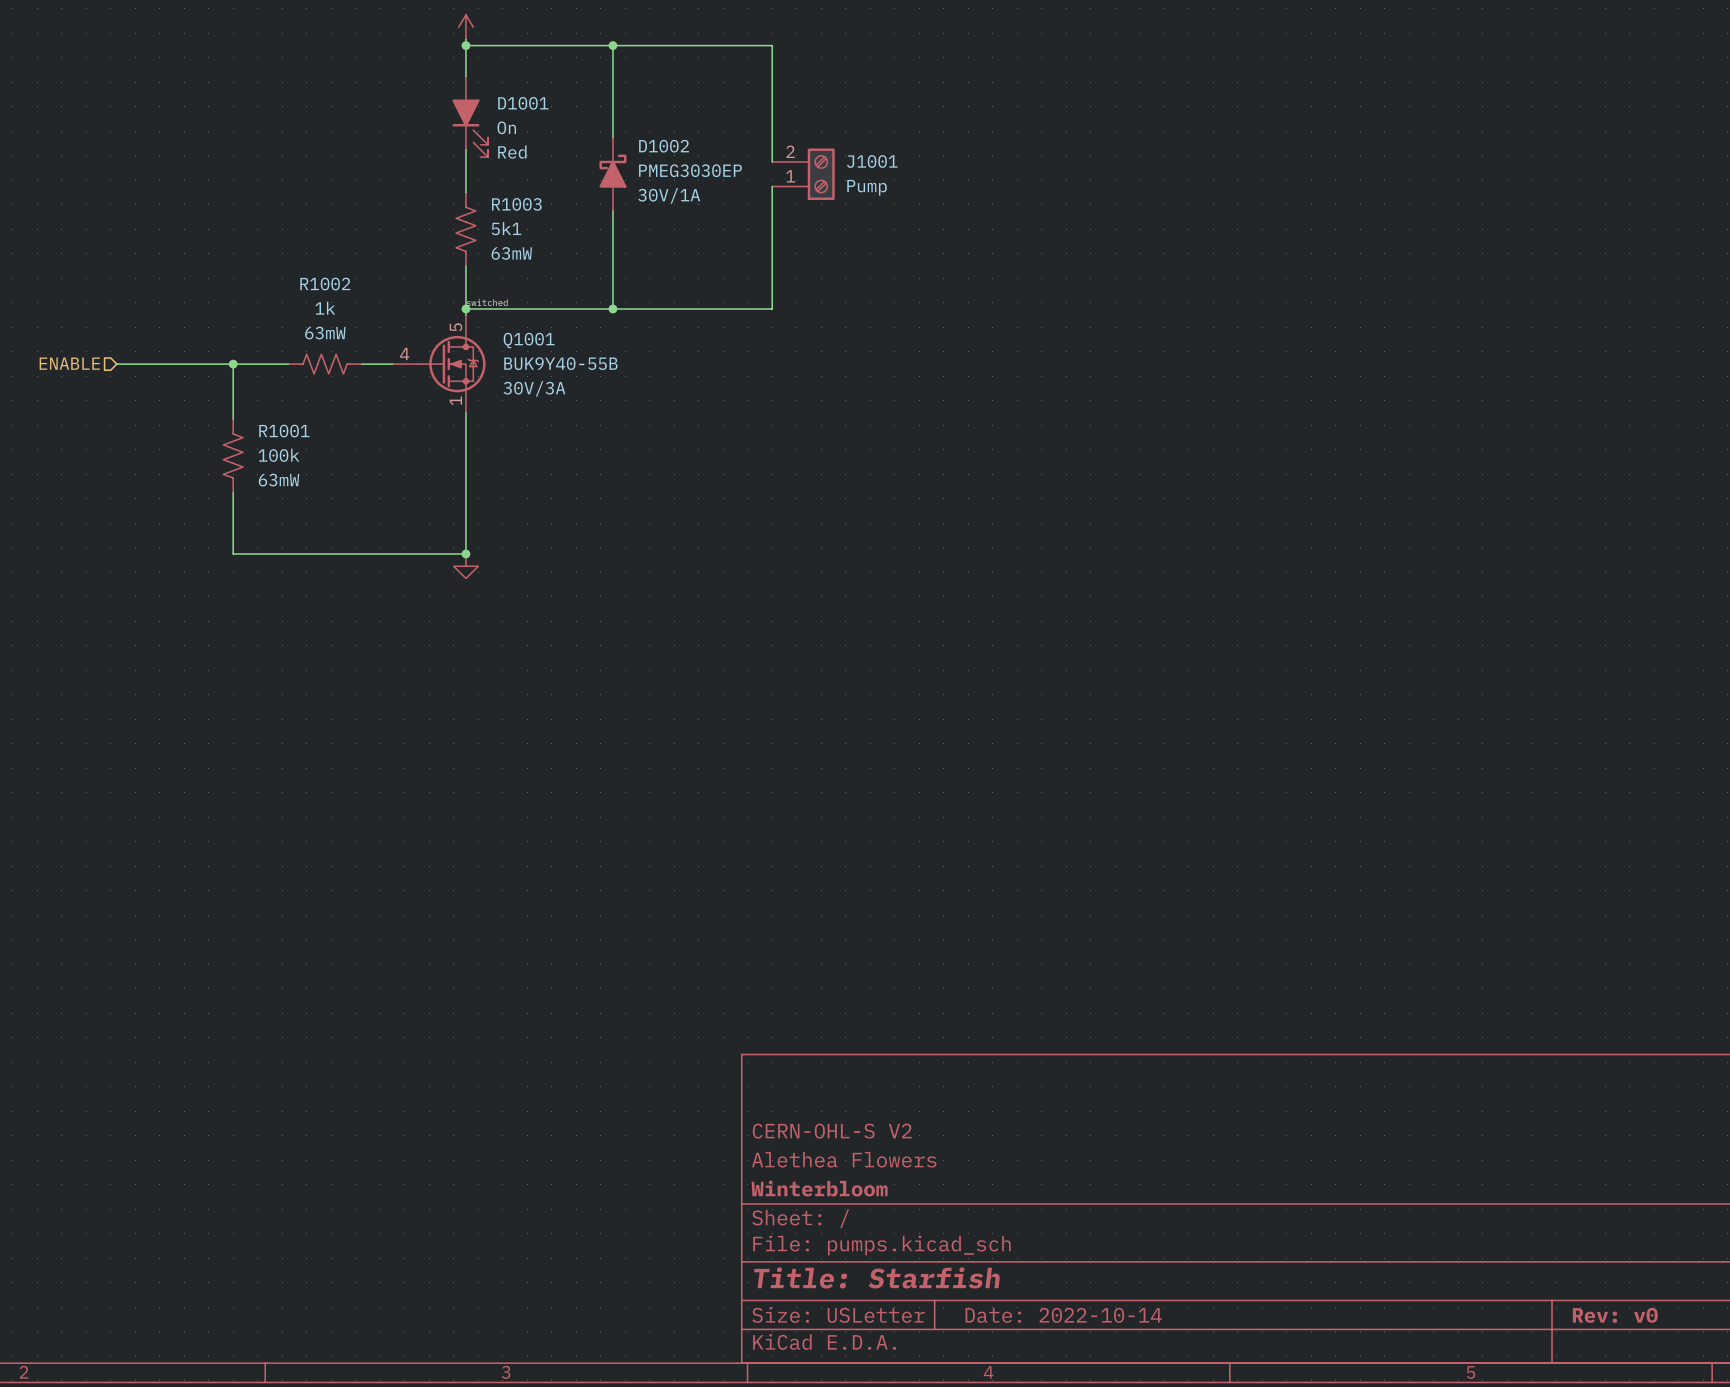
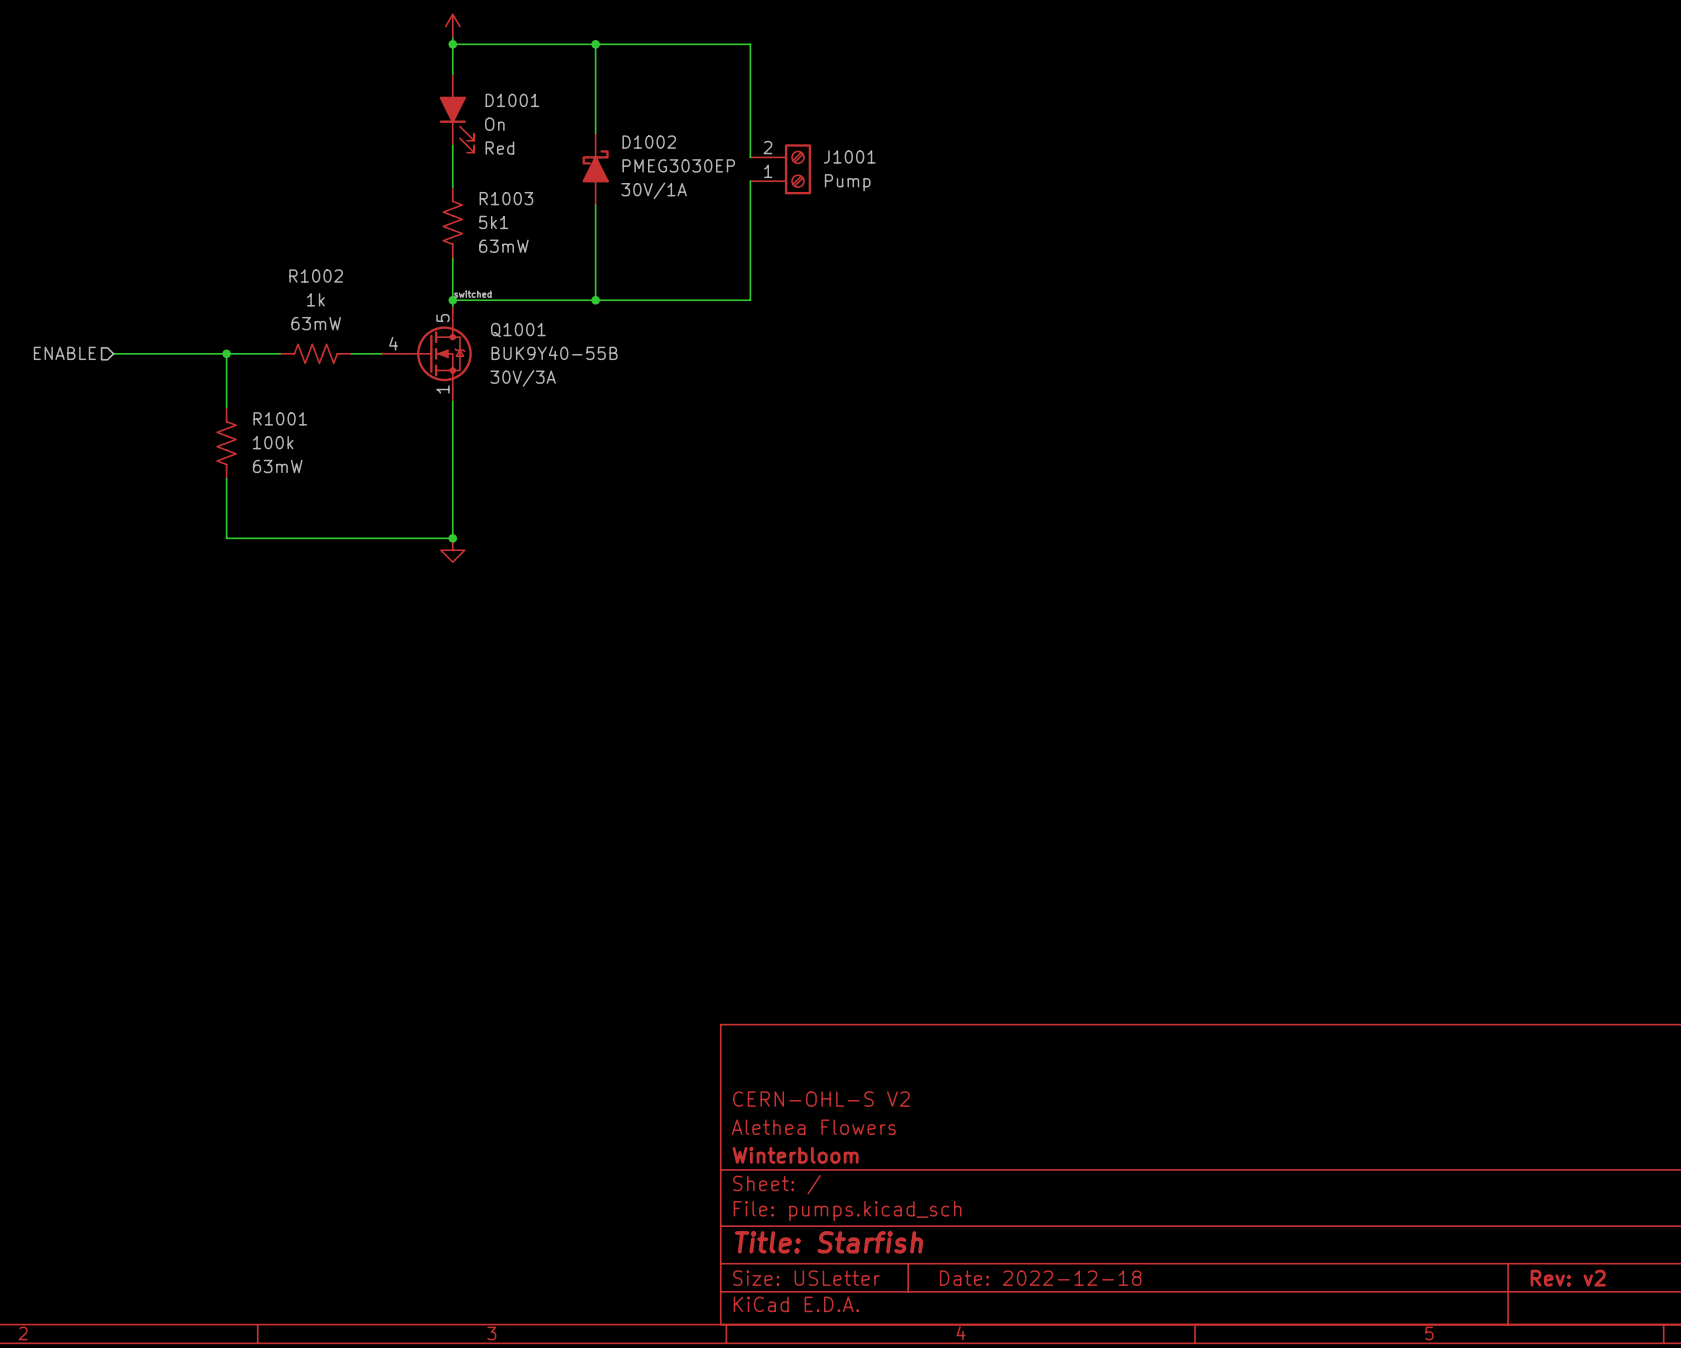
title block: Date: 2022-10-14 (1063, 1315) -> Date: 2022-12-18 (1040, 1278)
title block: Rev: v0 (1615, 1315) -> Rev: v2 (1568, 1278)

